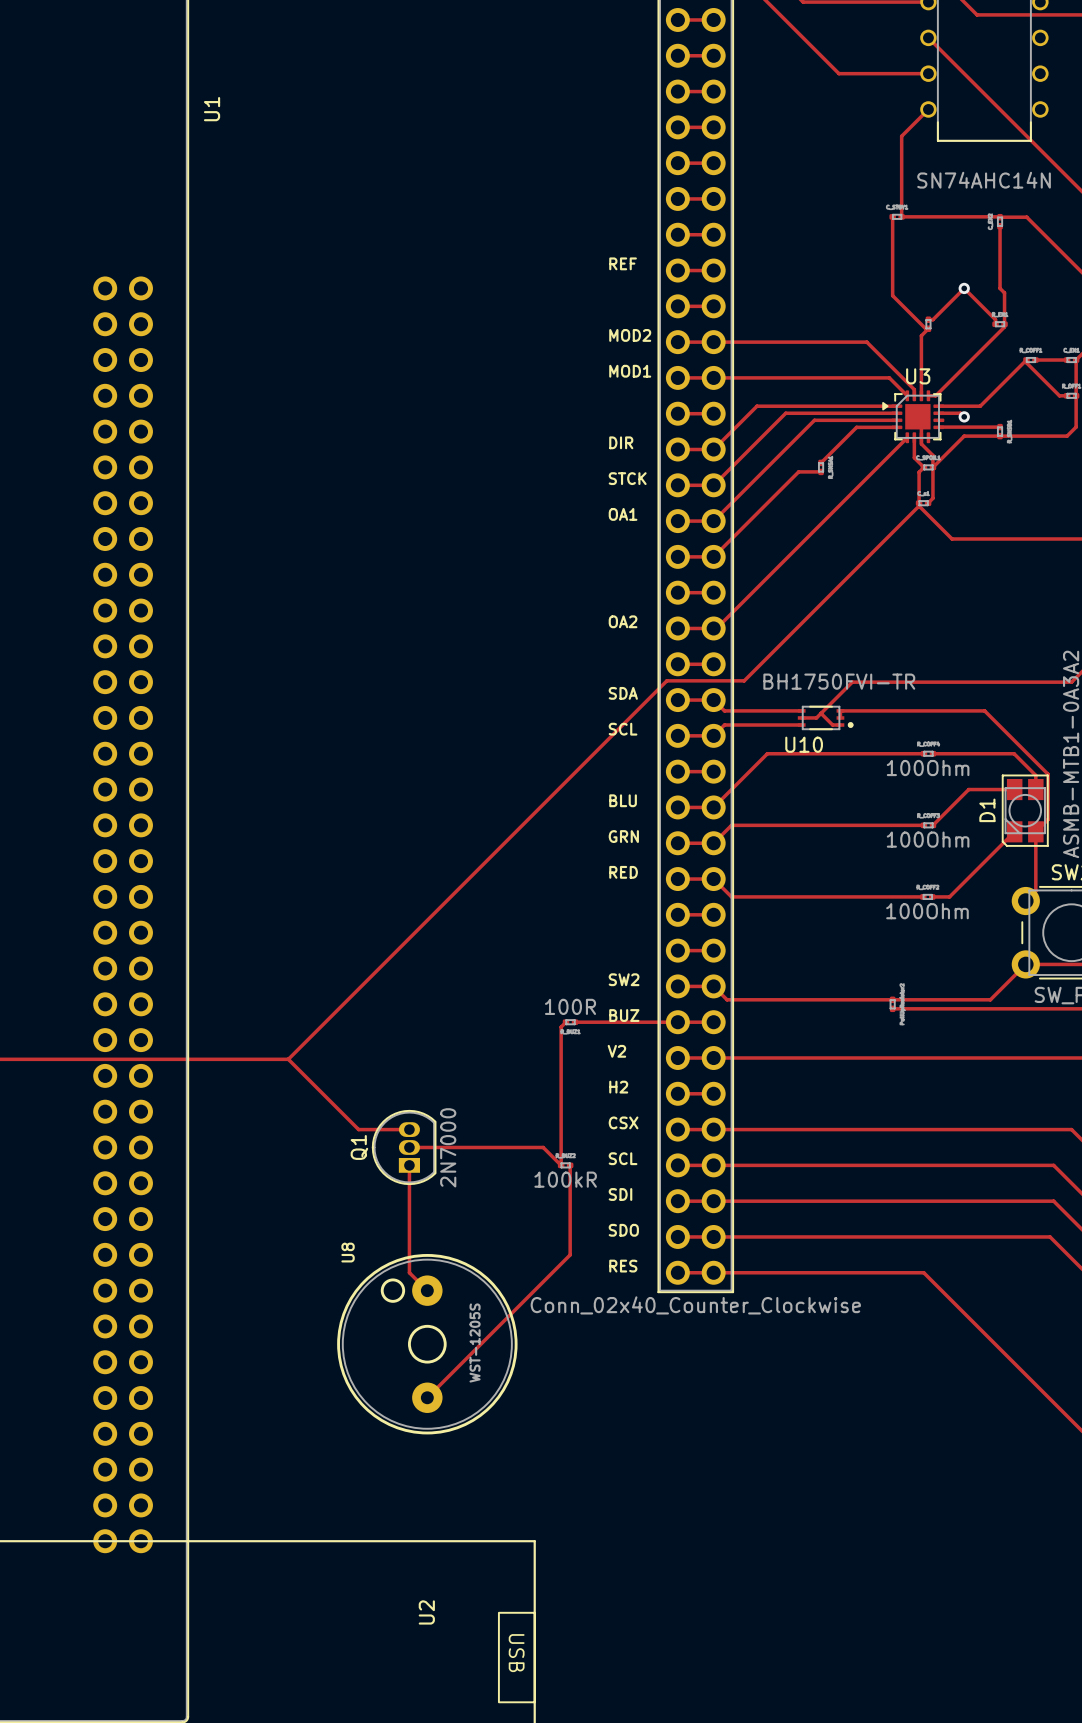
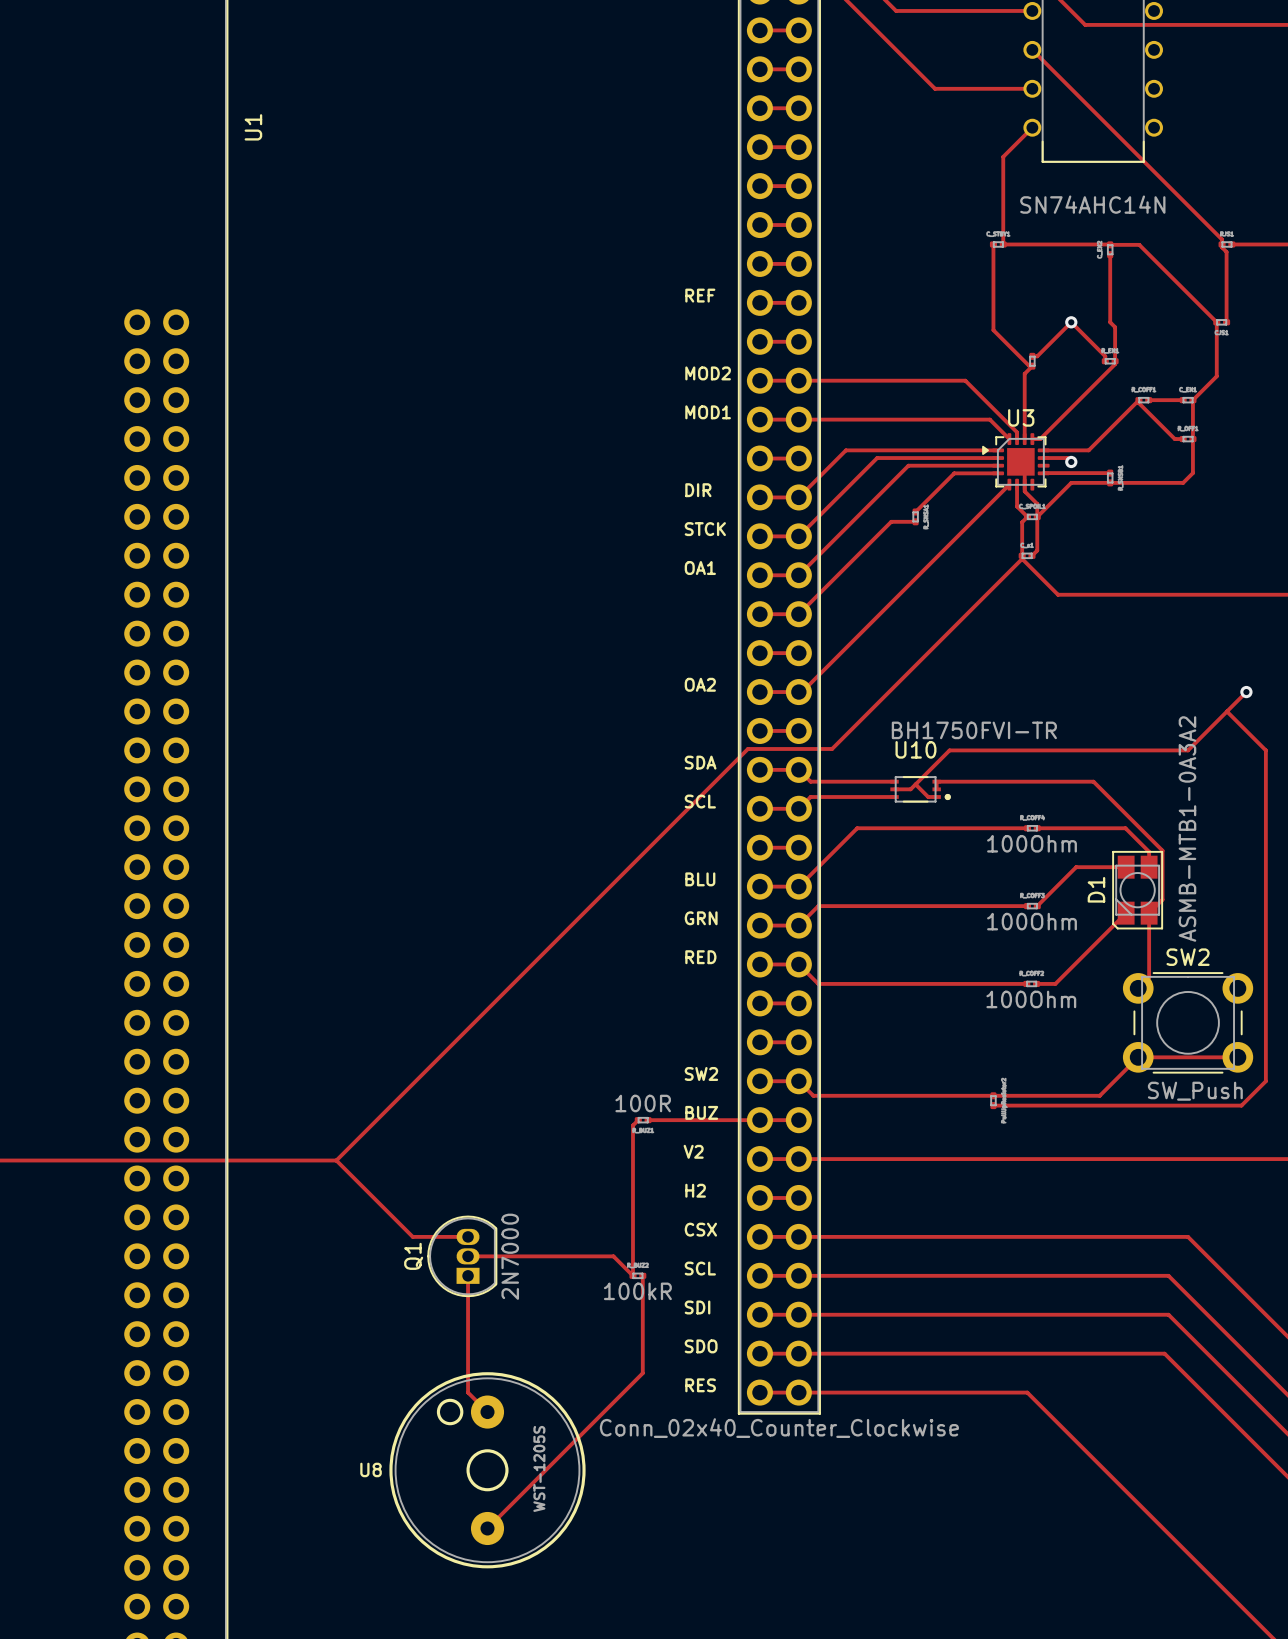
U10 value position: BH1750FVI-TR (839, 681) -> BH1750FVI-TR (974, 730)
U10 name position: U10 (804, 744) -> U10 (915, 749)
U8 name rotation: 0° (348, 1252) -> 90° clockwise (371, 1469)
U8 name position: U8 (348, 1252) -> U8 (371, 1469)

